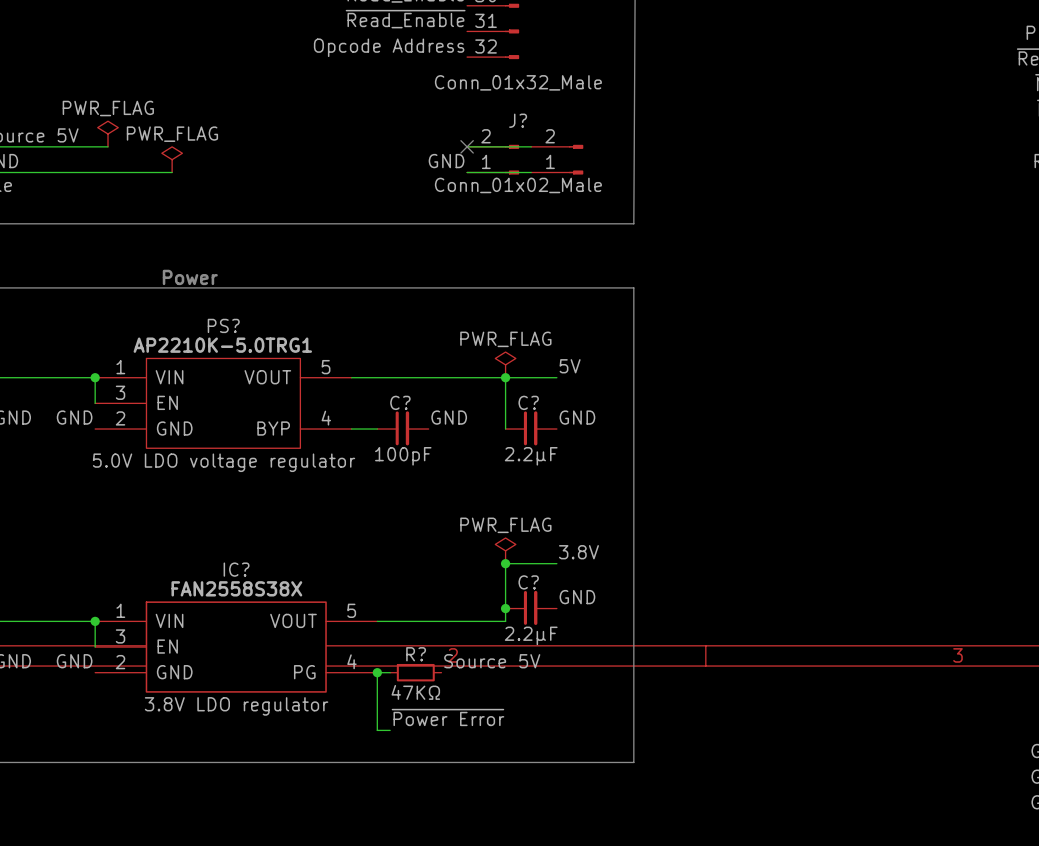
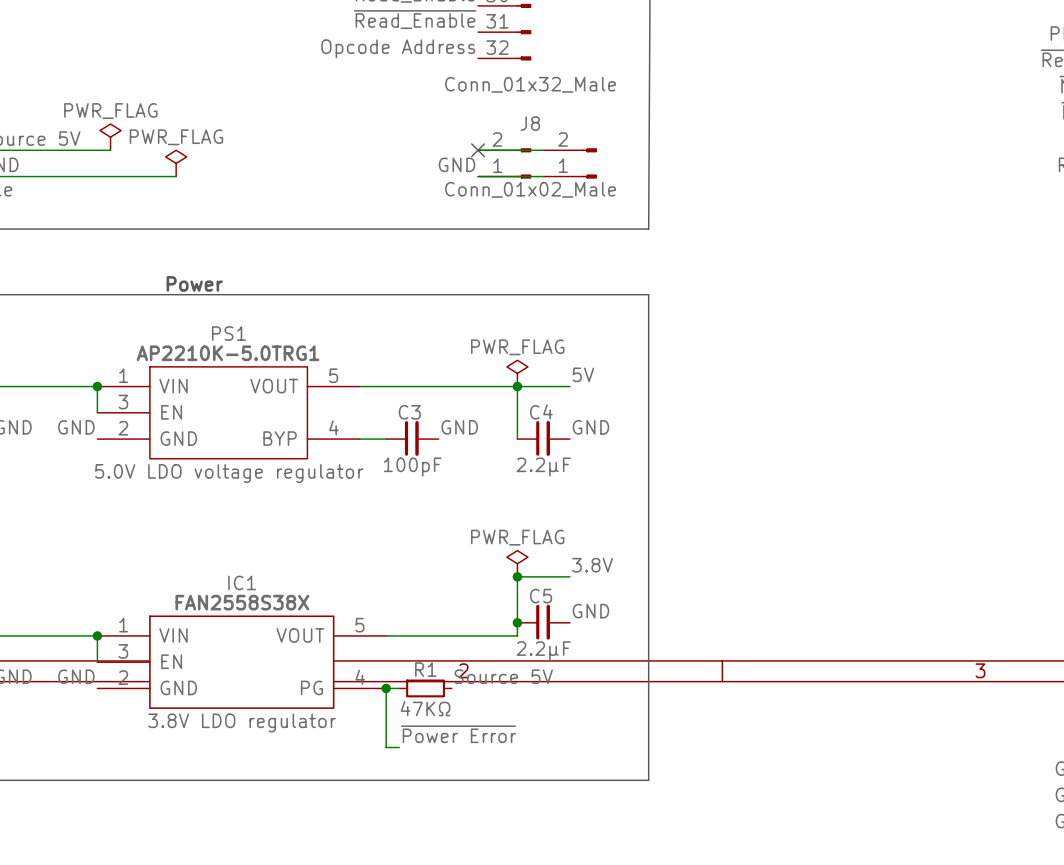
J? name: J? (518, 120) -> J8 (530, 123)
PS? name: PS? (223, 325) -> PS1 (228, 333)
C? name: C? (400, 402) -> C3 (409, 412)
C? name: C? (528, 402) -> C4 (541, 412)
IC? name: IC? (236, 569) -> IC1 (242, 582)
C? name: C? (528, 582) -> C5 (541, 596)
R? name: R? (416, 654) -> R1 (425, 669)

